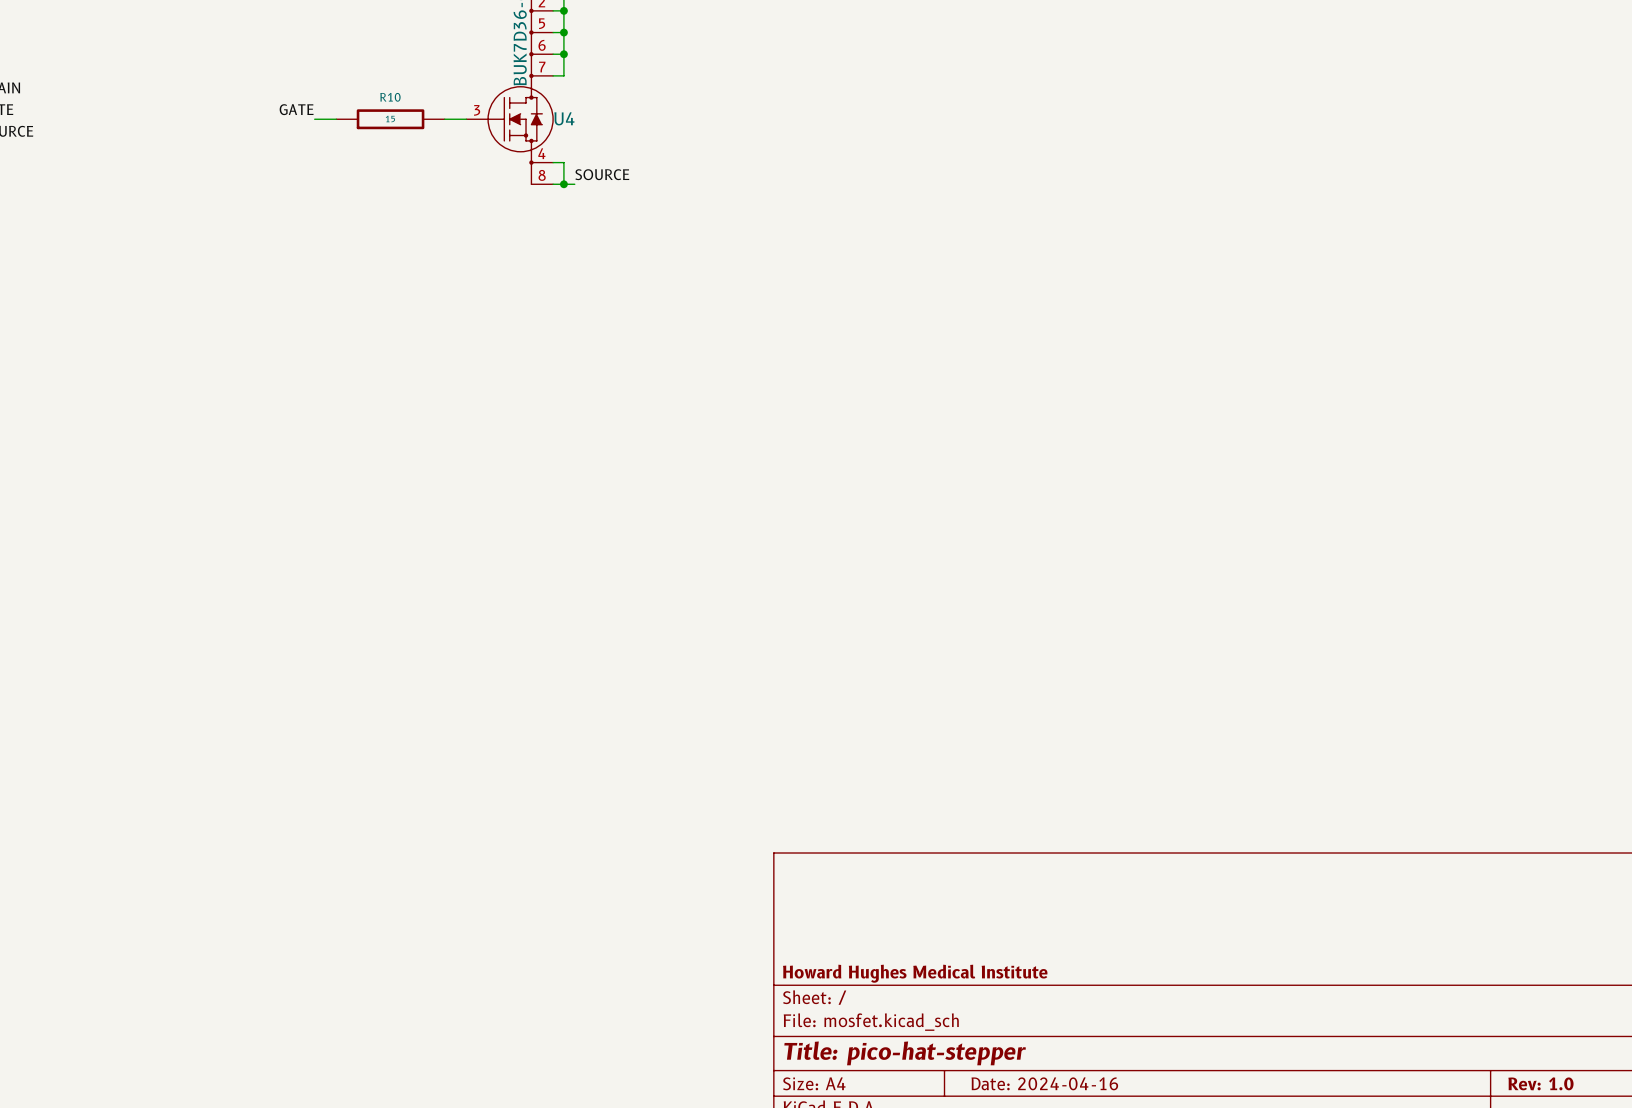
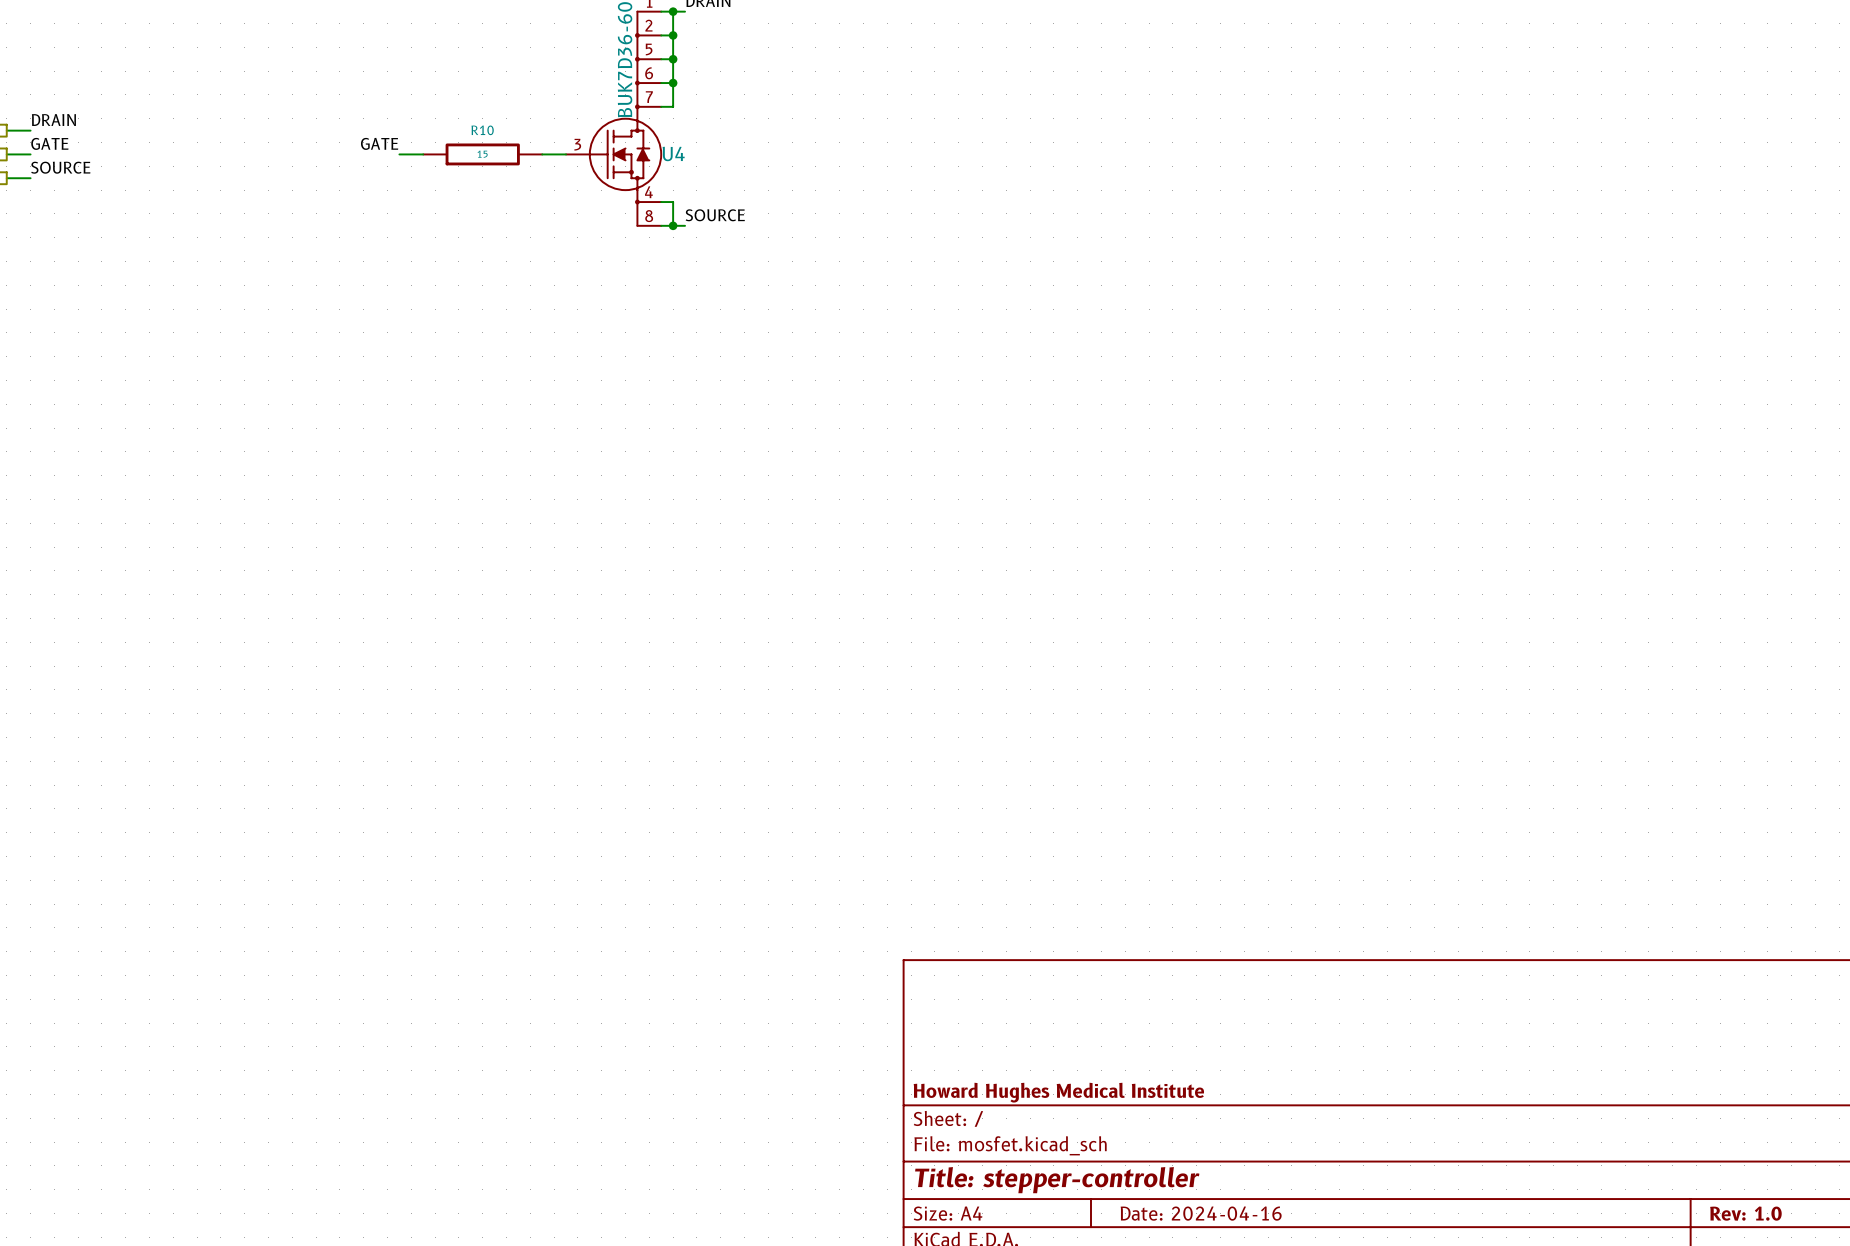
title block: Title: pico-hat-stepper (905, 1053) -> Title: stepper-controller (1057, 1180)

